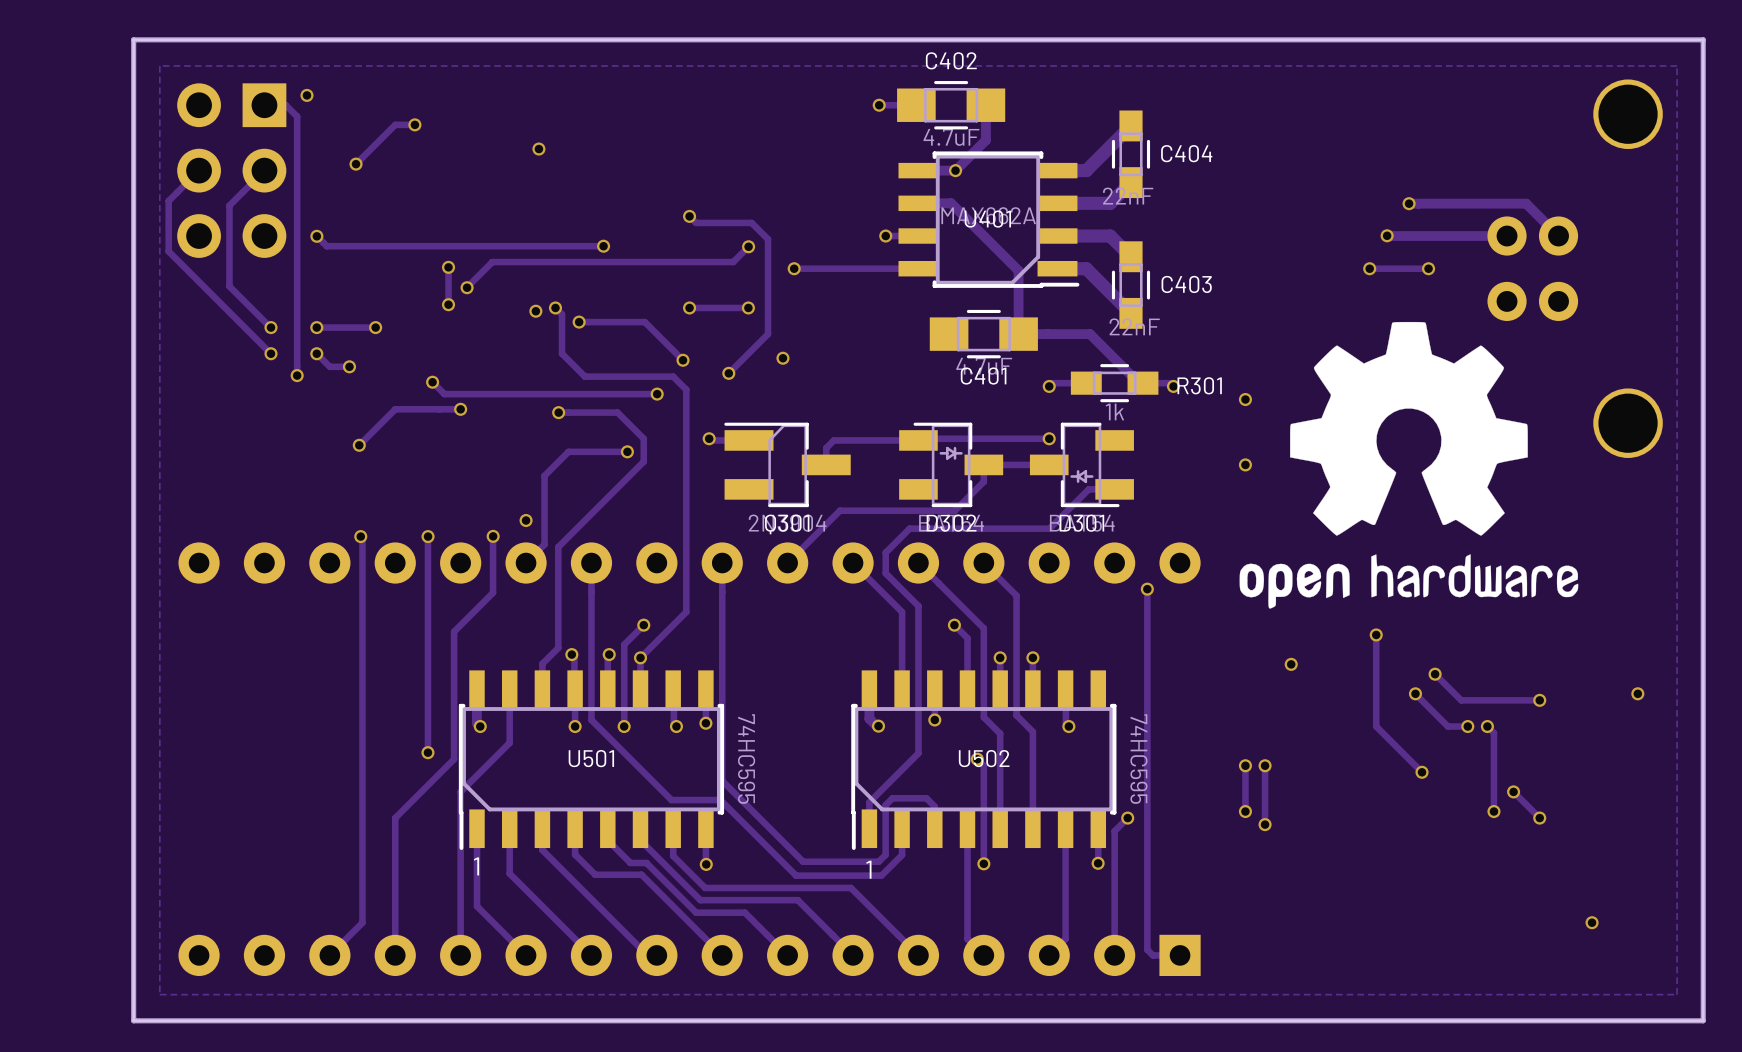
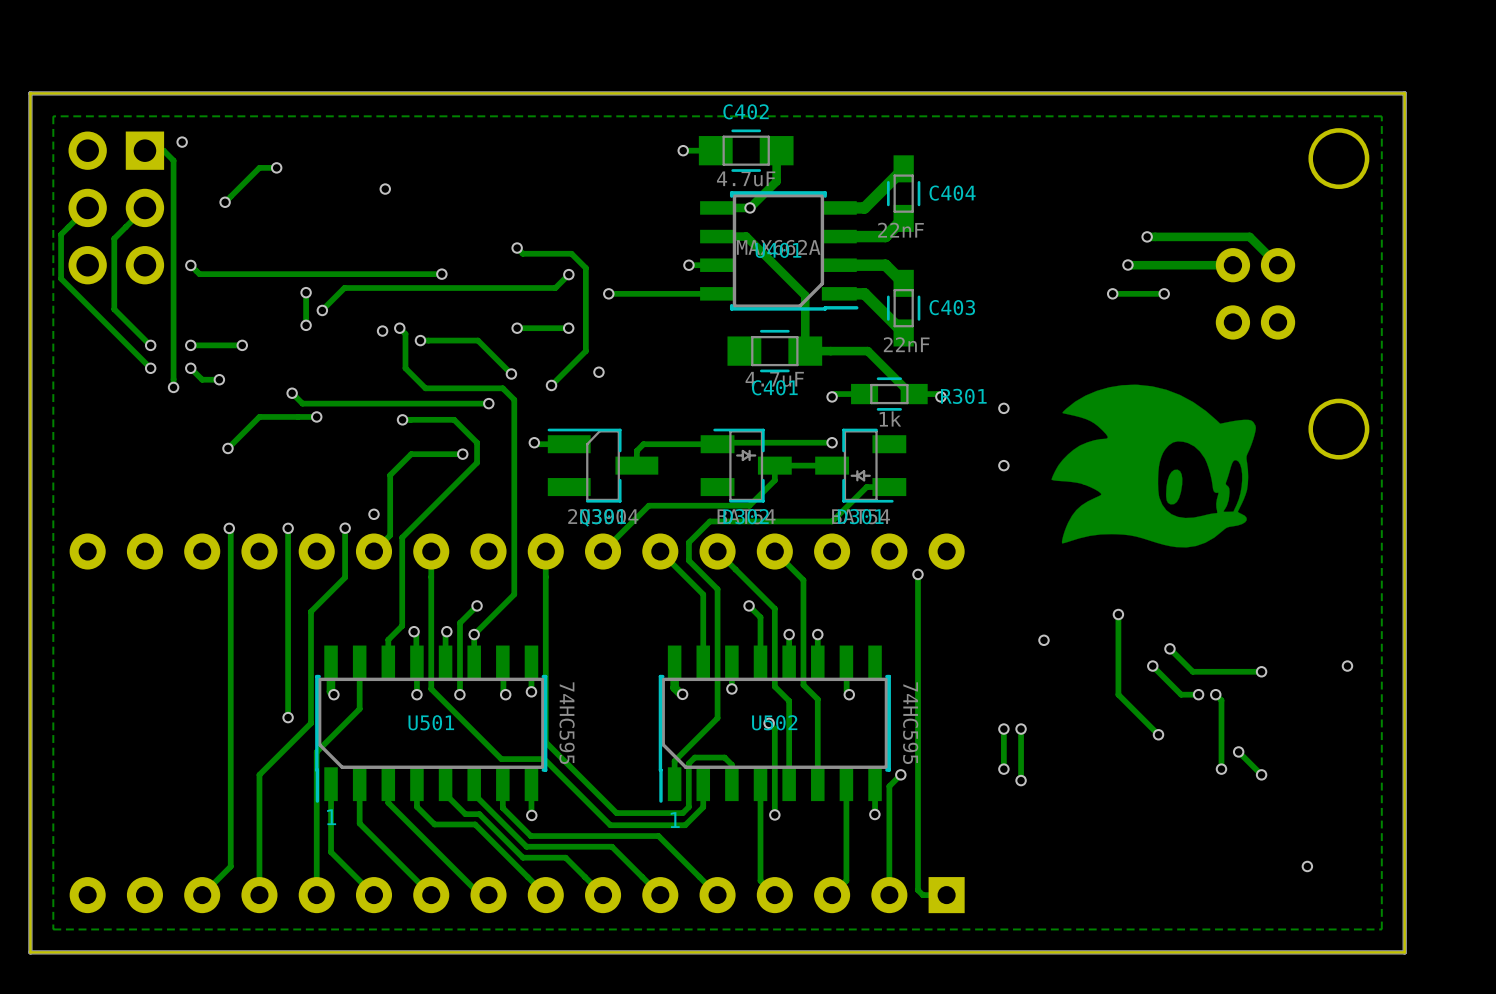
drawing shape: [1239, 321, 1579, 609] -> [1051, 384, 1256, 548]

